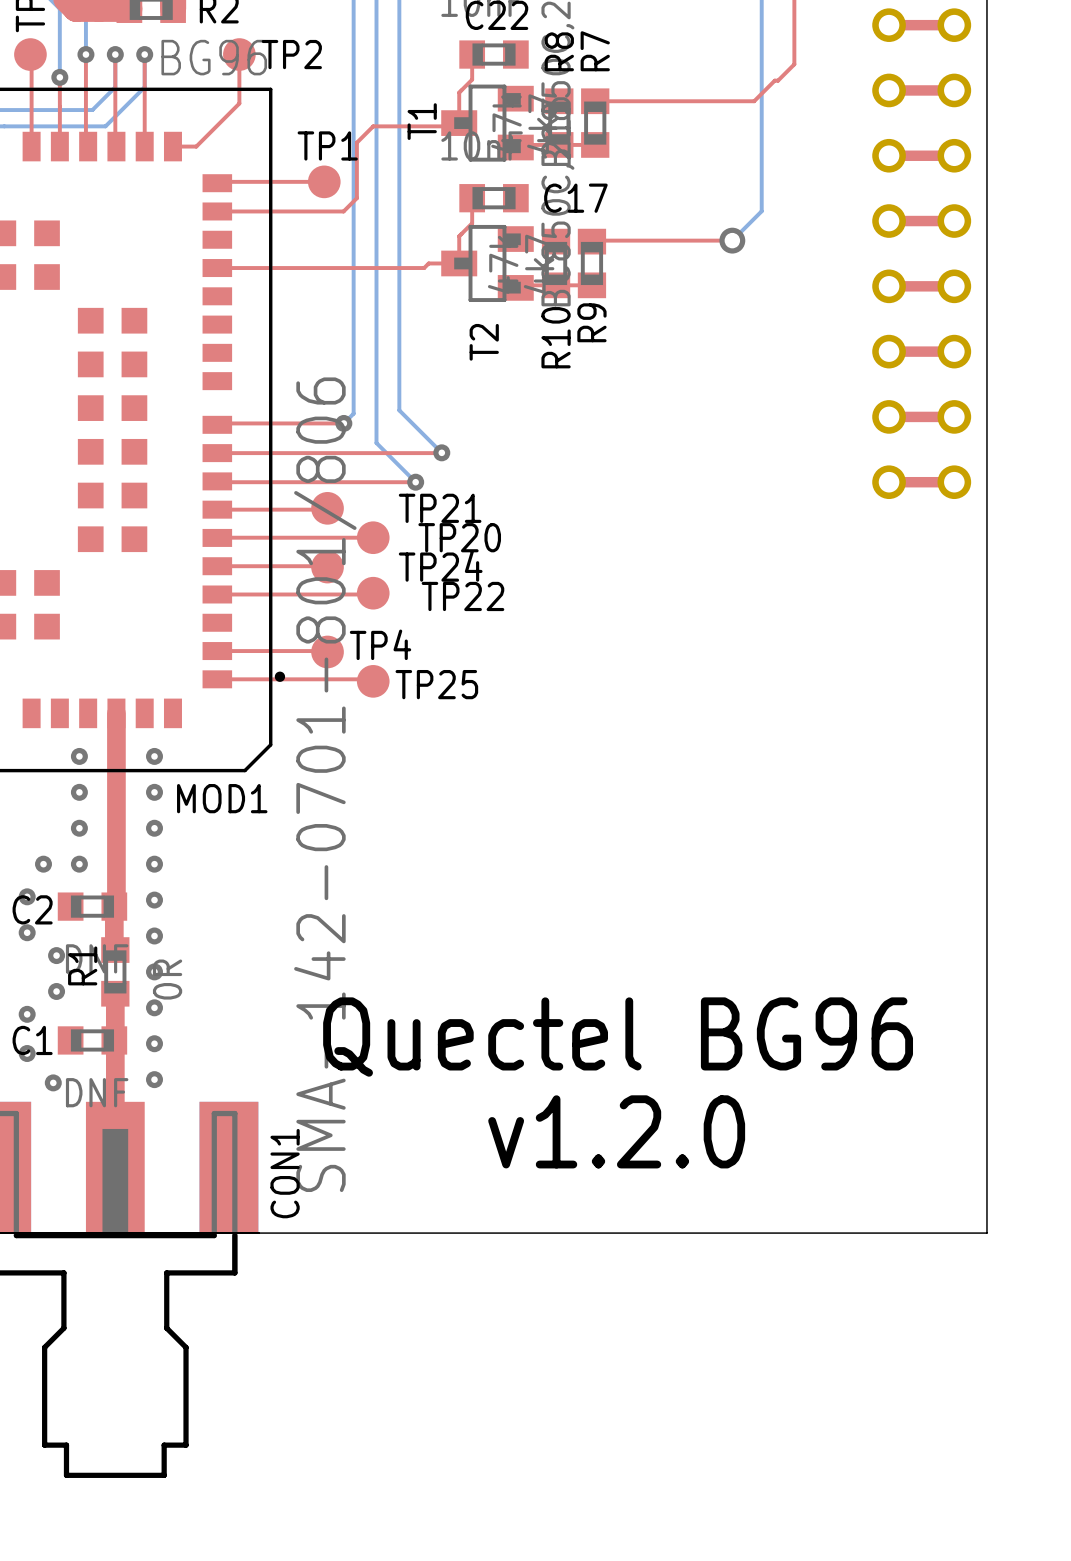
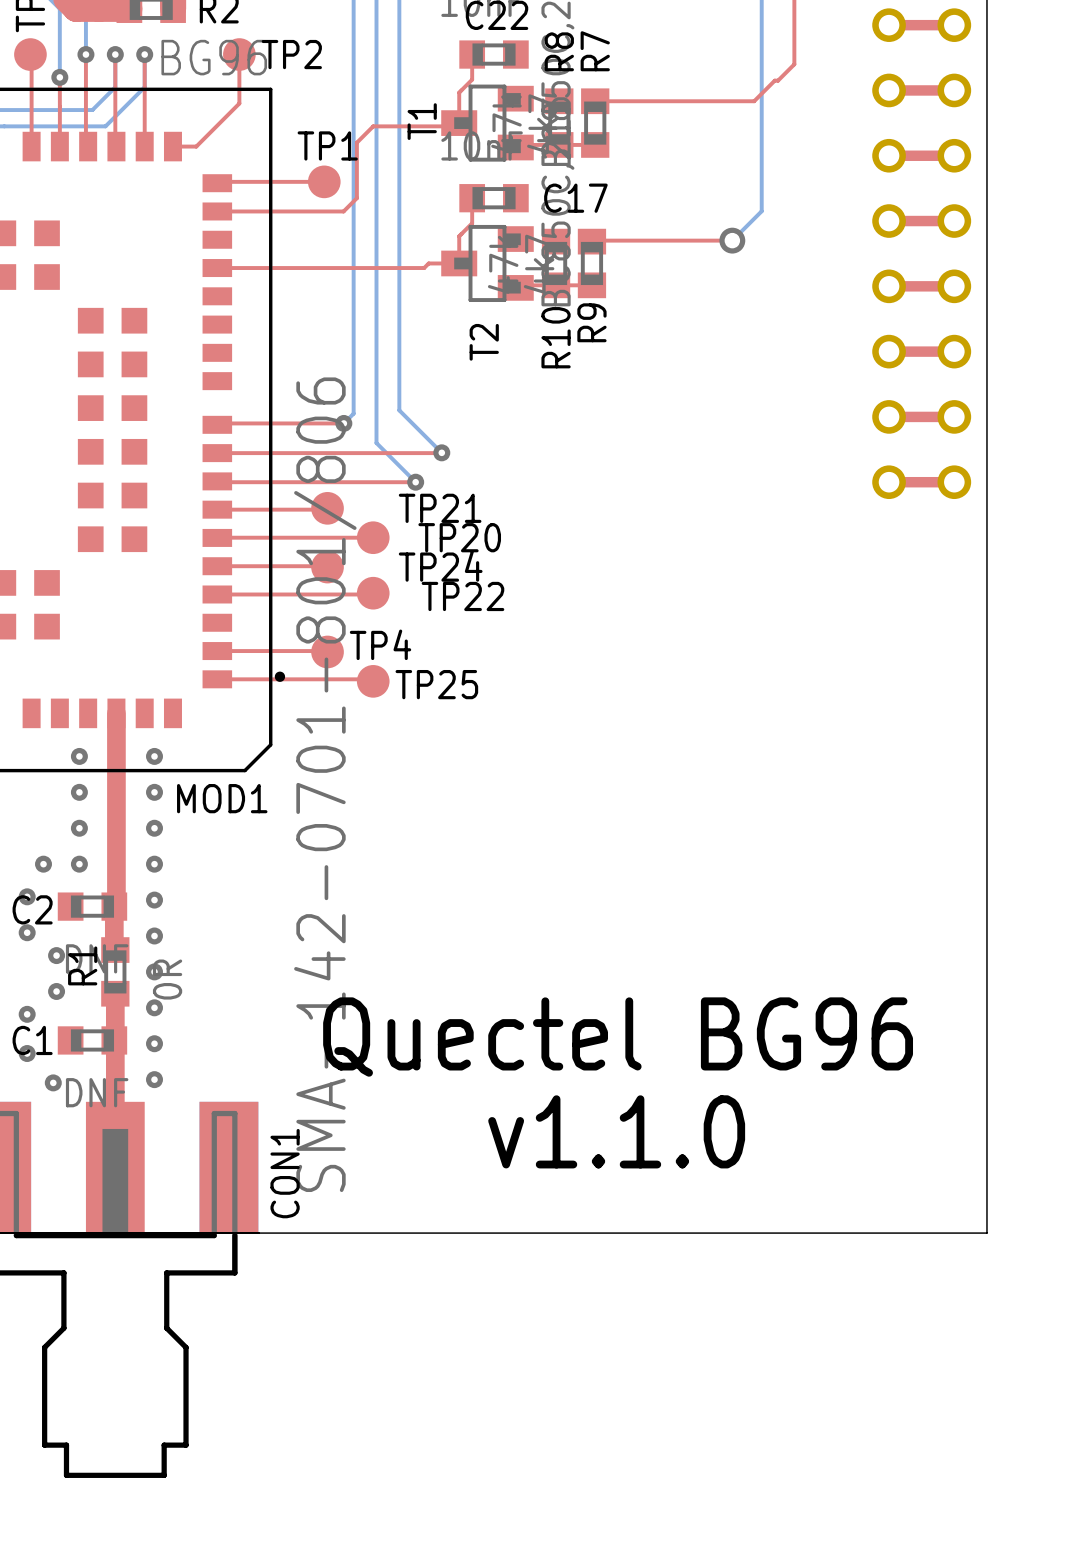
text: v1.2.0 (616, 1131) -> v1.1.0 (616, 1131)

